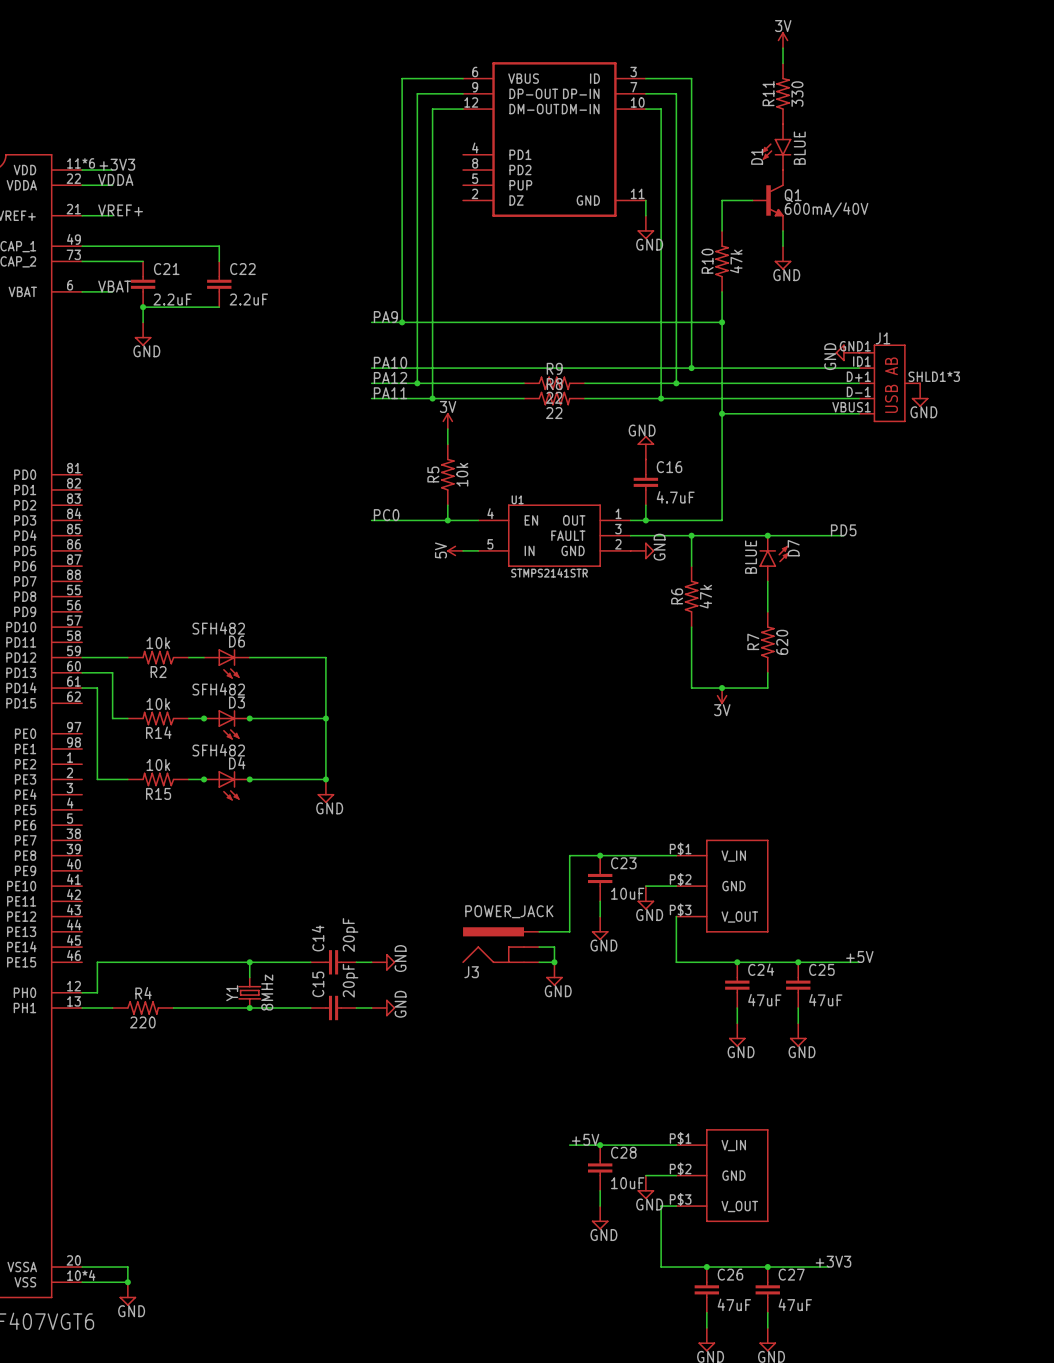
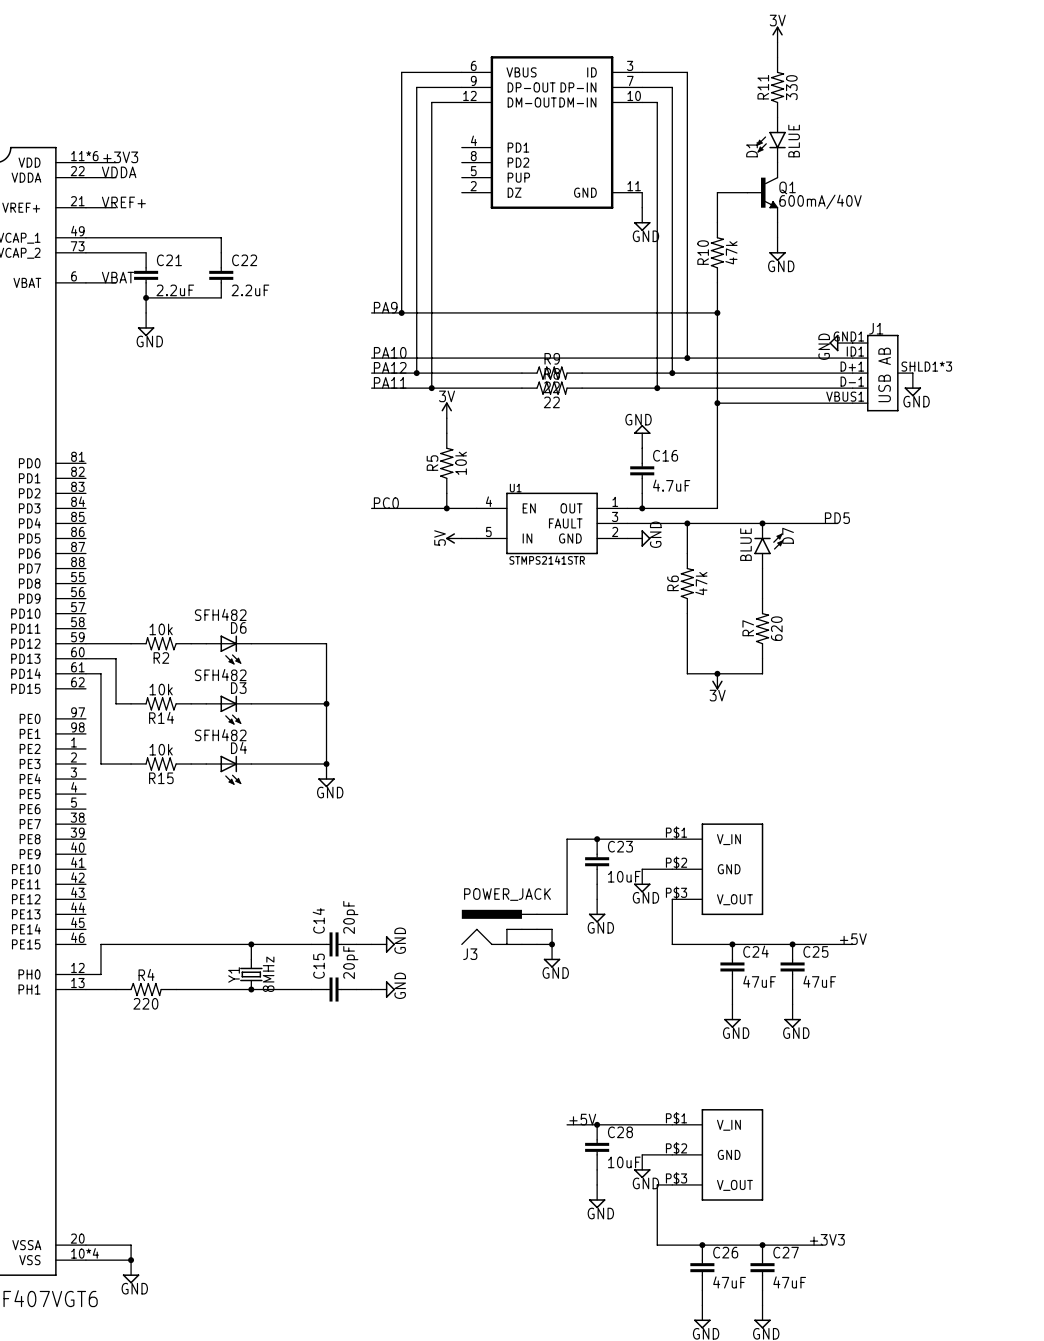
junction: (204, 718) -> none
junction: (249, 718) -> none
junction: (204, 779) -> none
junction: (249, 779) -> none

